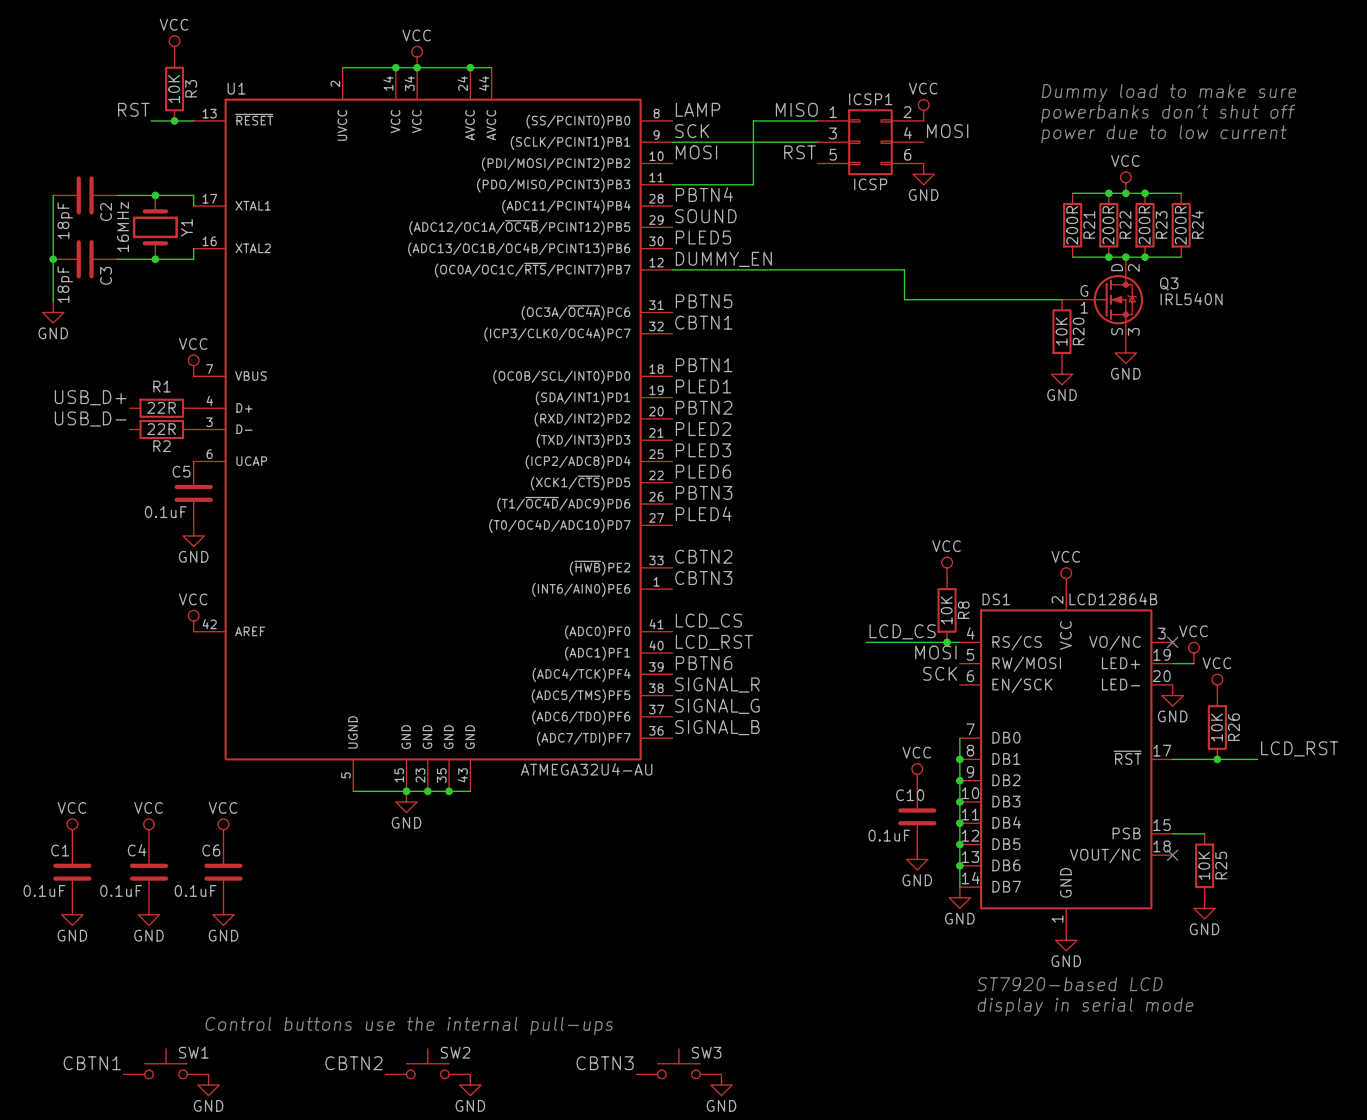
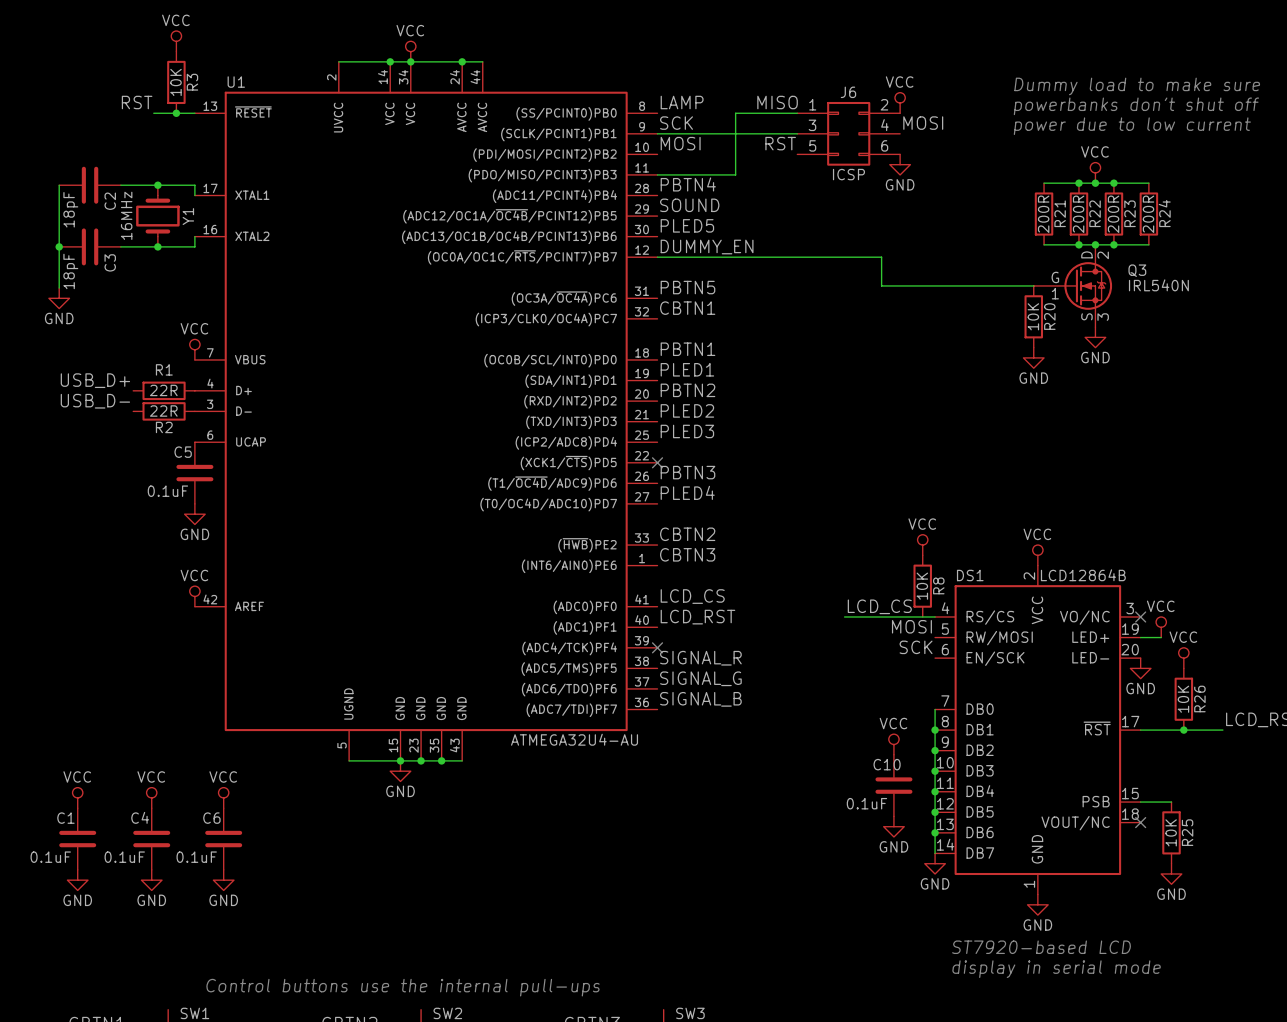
ICSP1 name: ICSP1 (870, 99) -> J6 (848, 92)
label: PLED6 (703, 471) -> none
no-connect mark: none -> (657, 462)
junction: (947, 642) -> none
label: PBTN6 (704, 663) -> none
no-connect mark: none -> (657, 647)

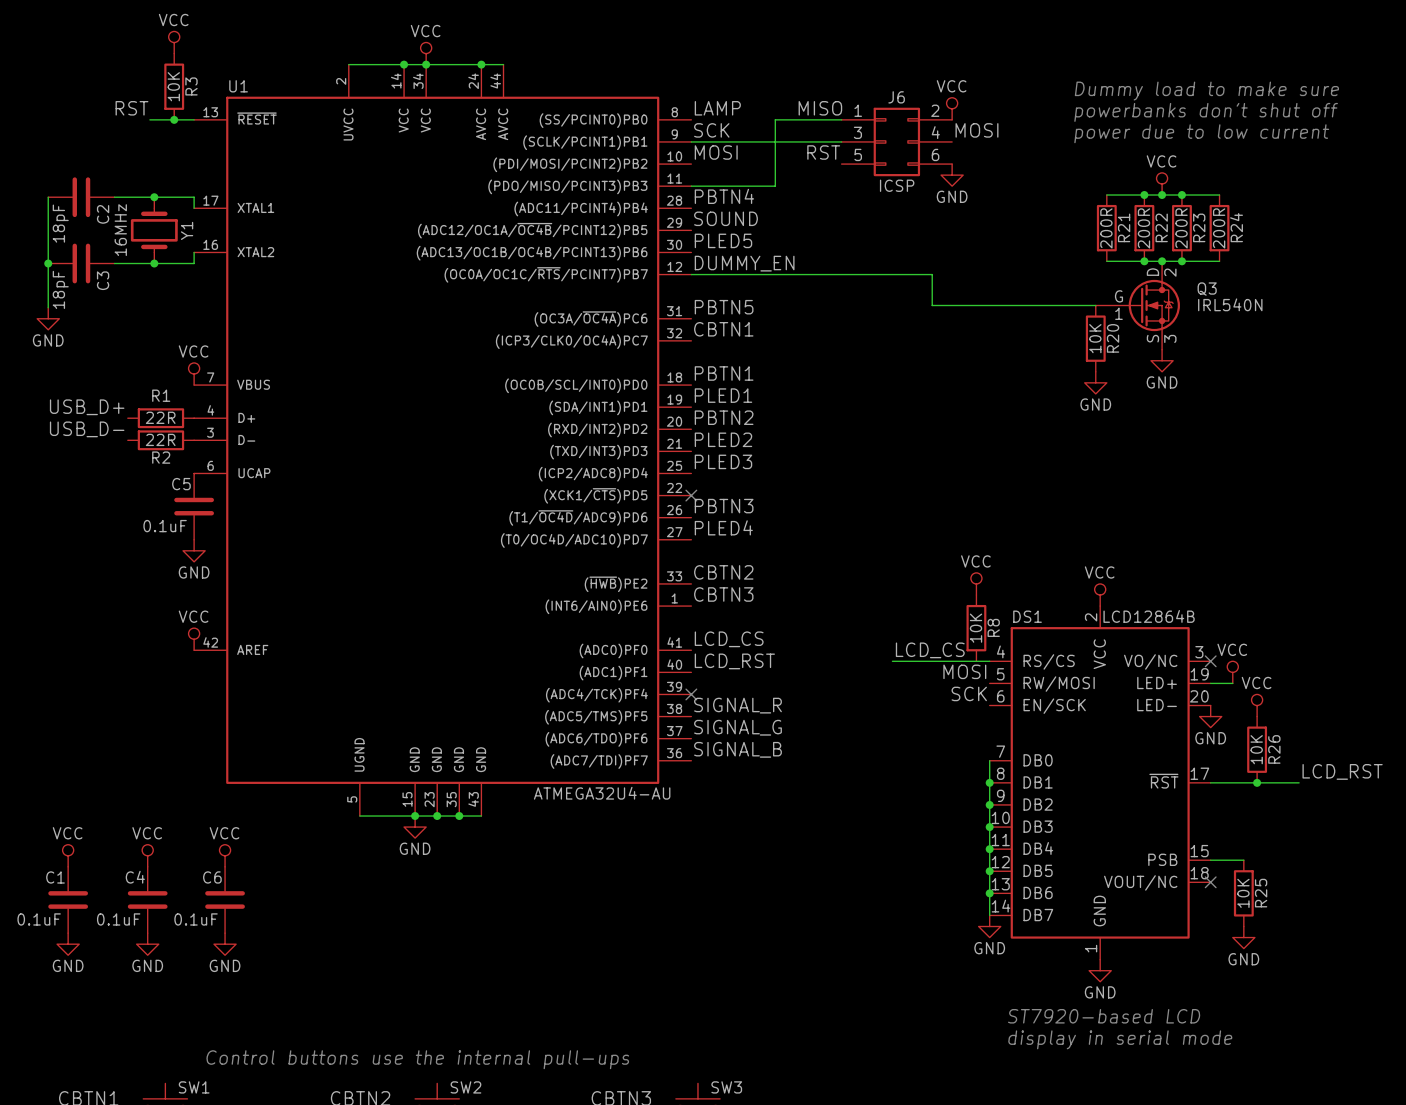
power symbol: VCC (893, 744) -> none
C10: 0.1uF (893, 785) -> none
power symbol: GND (893, 826) -> none

